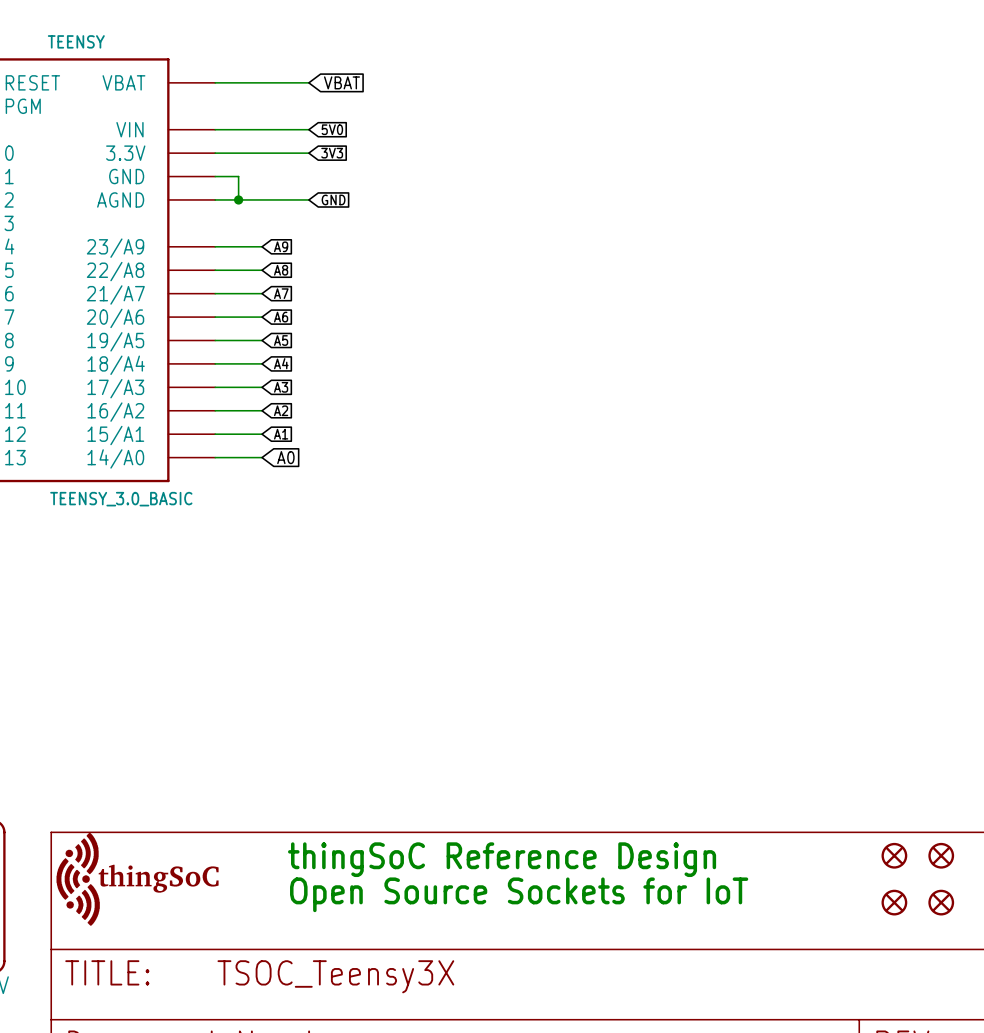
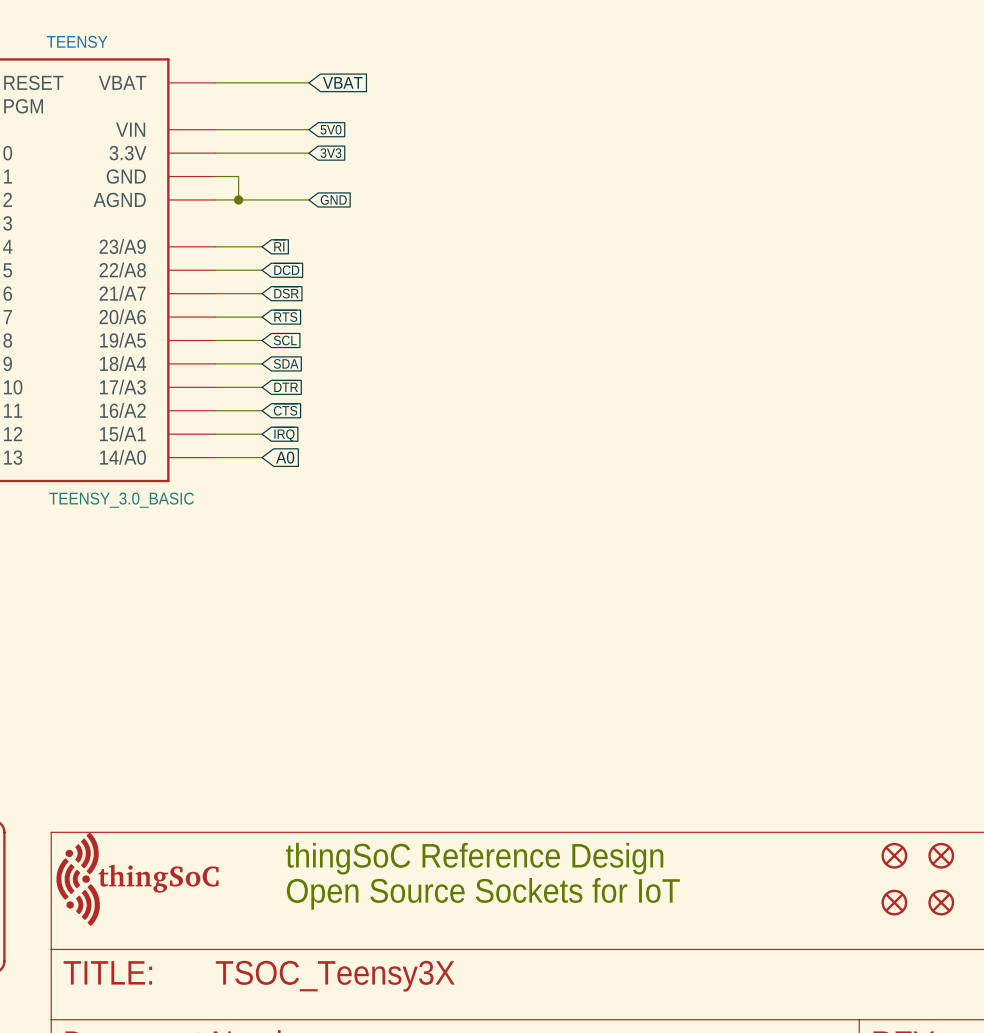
global label: A9 (281, 246) -> ~{RI} (279, 245)
global label: A8 (281, 270) -> ~{DCD} (286, 269)
global label: A7 (281, 293) -> ~{DSR} (286, 292)
global label: A6 (281, 317) -> ~{RTS} (285, 316)
global label: A5 (281, 340) -> SCL (285, 340)
global label: A4 (281, 363) -> SDA (286, 363)
global label: A3 (281, 387) -> ~{DTR} (286, 386)
global label: A2 (281, 410) -> ~{CTS} (285, 409)
global label: A1 (281, 434) -> ~{IRQ} (284, 434)

